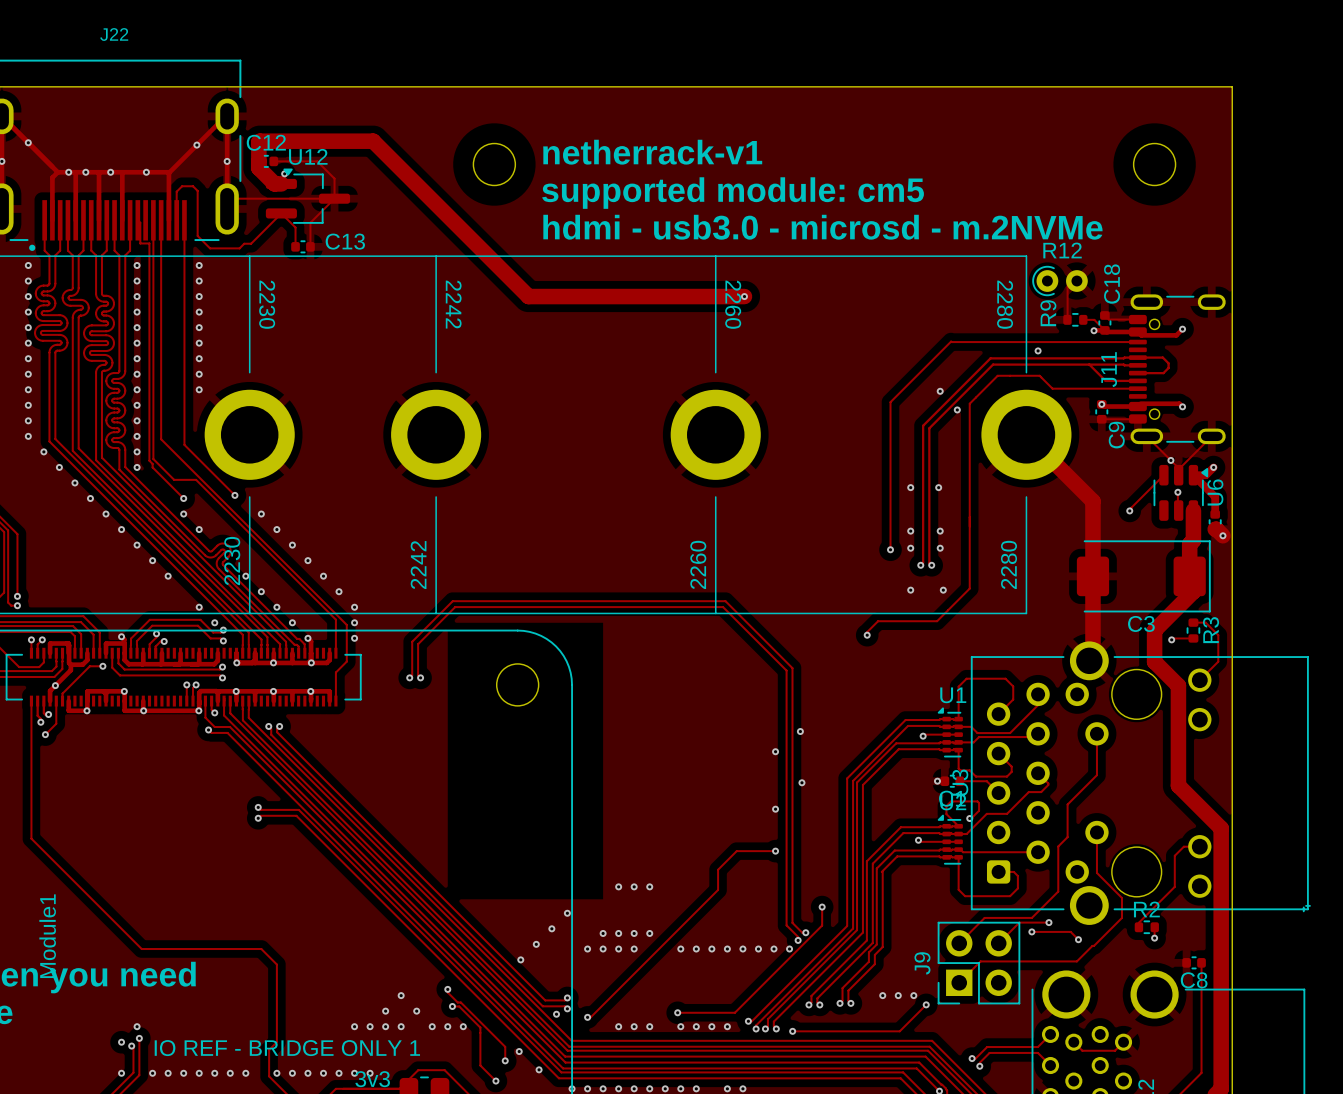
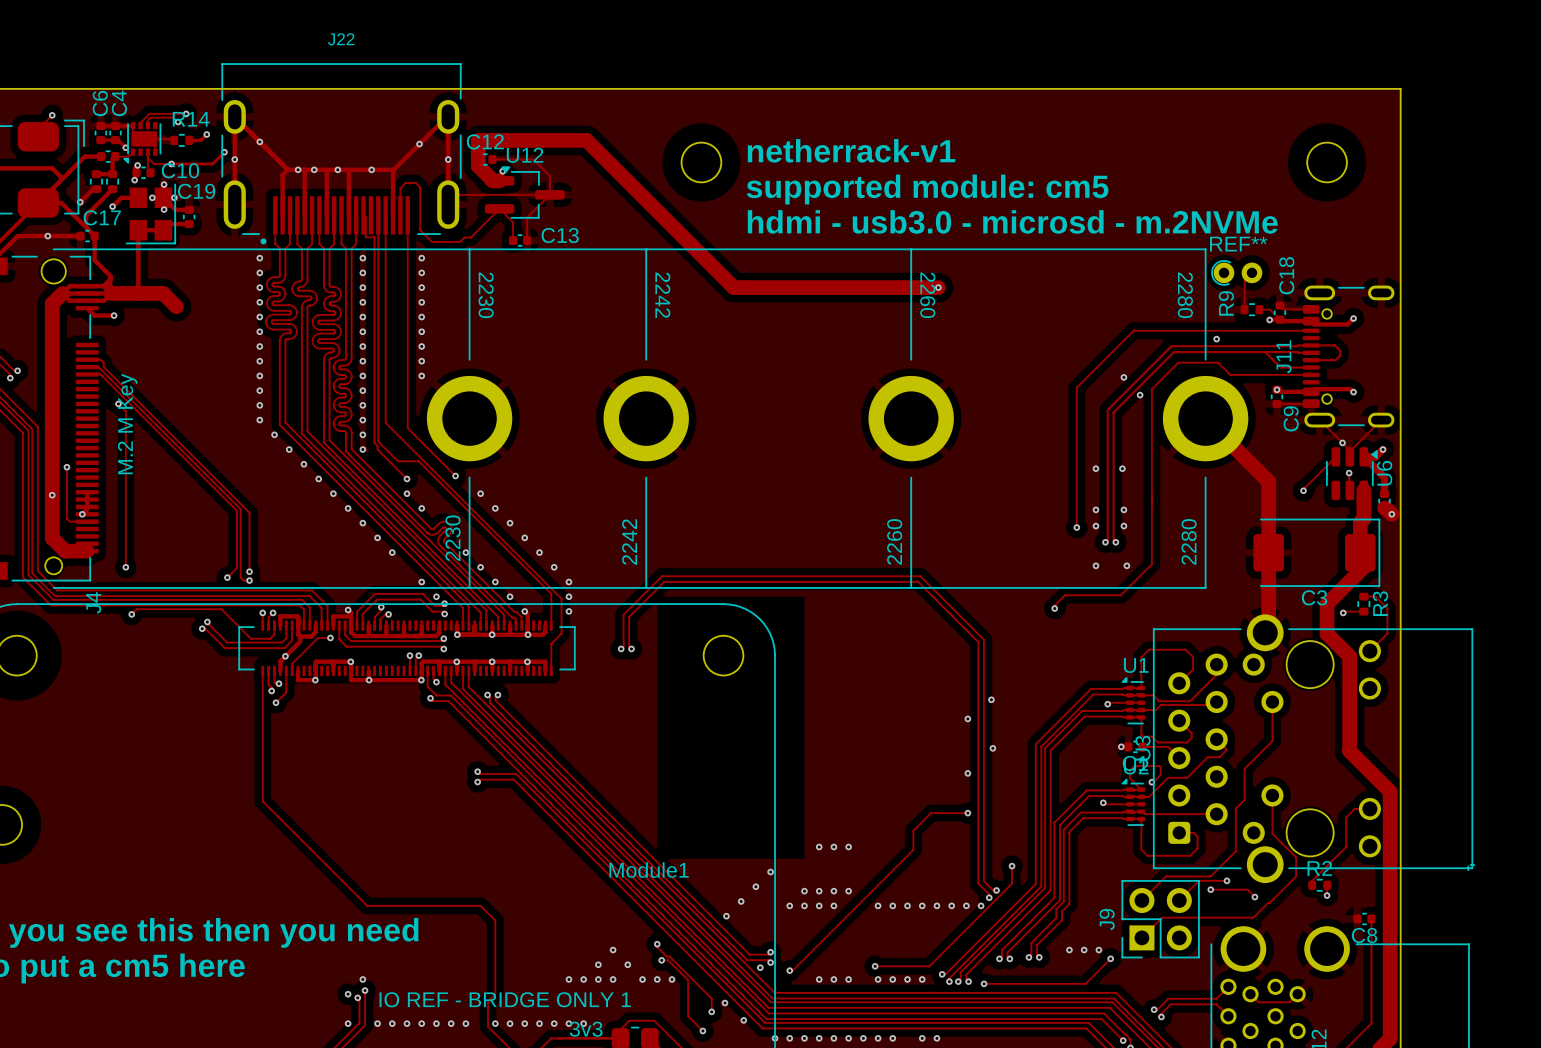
R12: (1059, 281) -> none
REF**: none -> (1236, 272)
Module1 name rotation: 0° (47, 936) -> 90° clockwise (649, 870)
Module1 name position: Module1 (47, 936) -> Module1 (649, 870)

